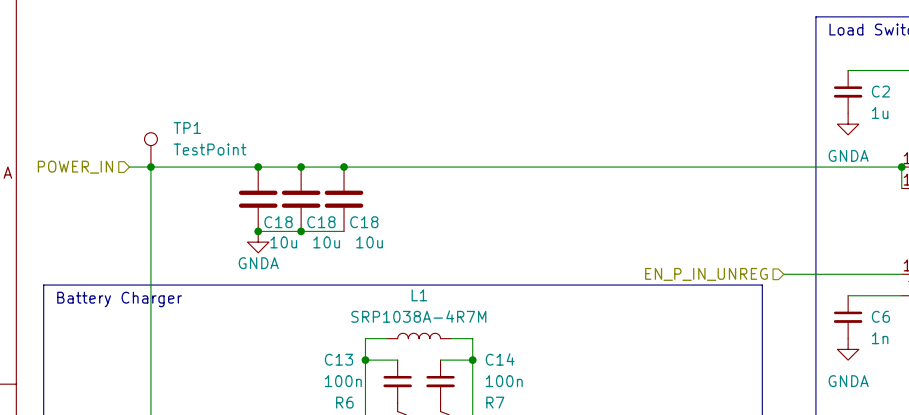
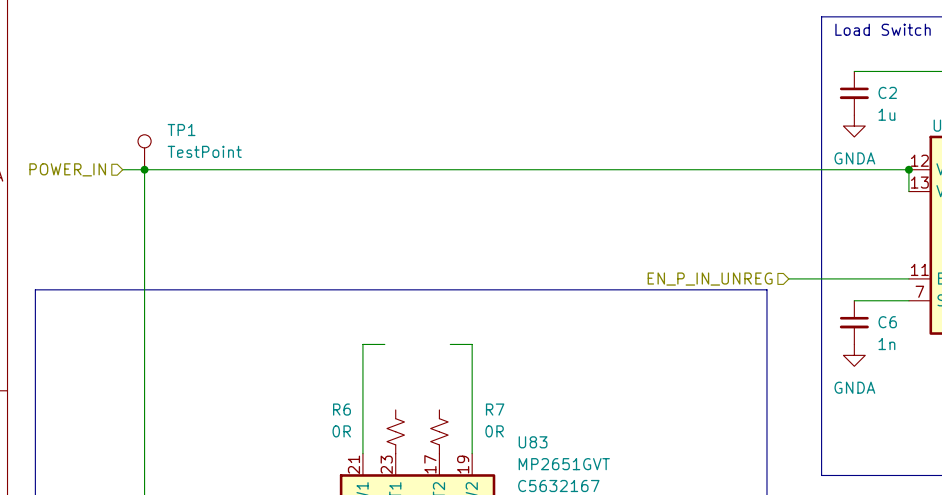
junction: (258, 167) -> none
junction: (301, 167) -> none
junction: (344, 167) -> none
C18: 10u (258, 199) -> none
C18: 10u (301, 199) -> none
C18: 10u (344, 199) -> none
wire: (258, 231) (344, 231) -> none
junction: (258, 231) -> none
junction: (301, 231) -> none
power symbol: GNDA (258, 242) -> none
text: Battery Charger (119, 299) -> none
L1: SRP1038A-4R7M (419, 335) -> none
wire: (365, 360) (397, 360) -> none
junction: (365, 360) -> none
wire: (440, 360) (472, 360) -> none
junction: (472, 360) -> none
C13: 100n (397, 381) -> none
C14: 100n (440, 381) -> none

